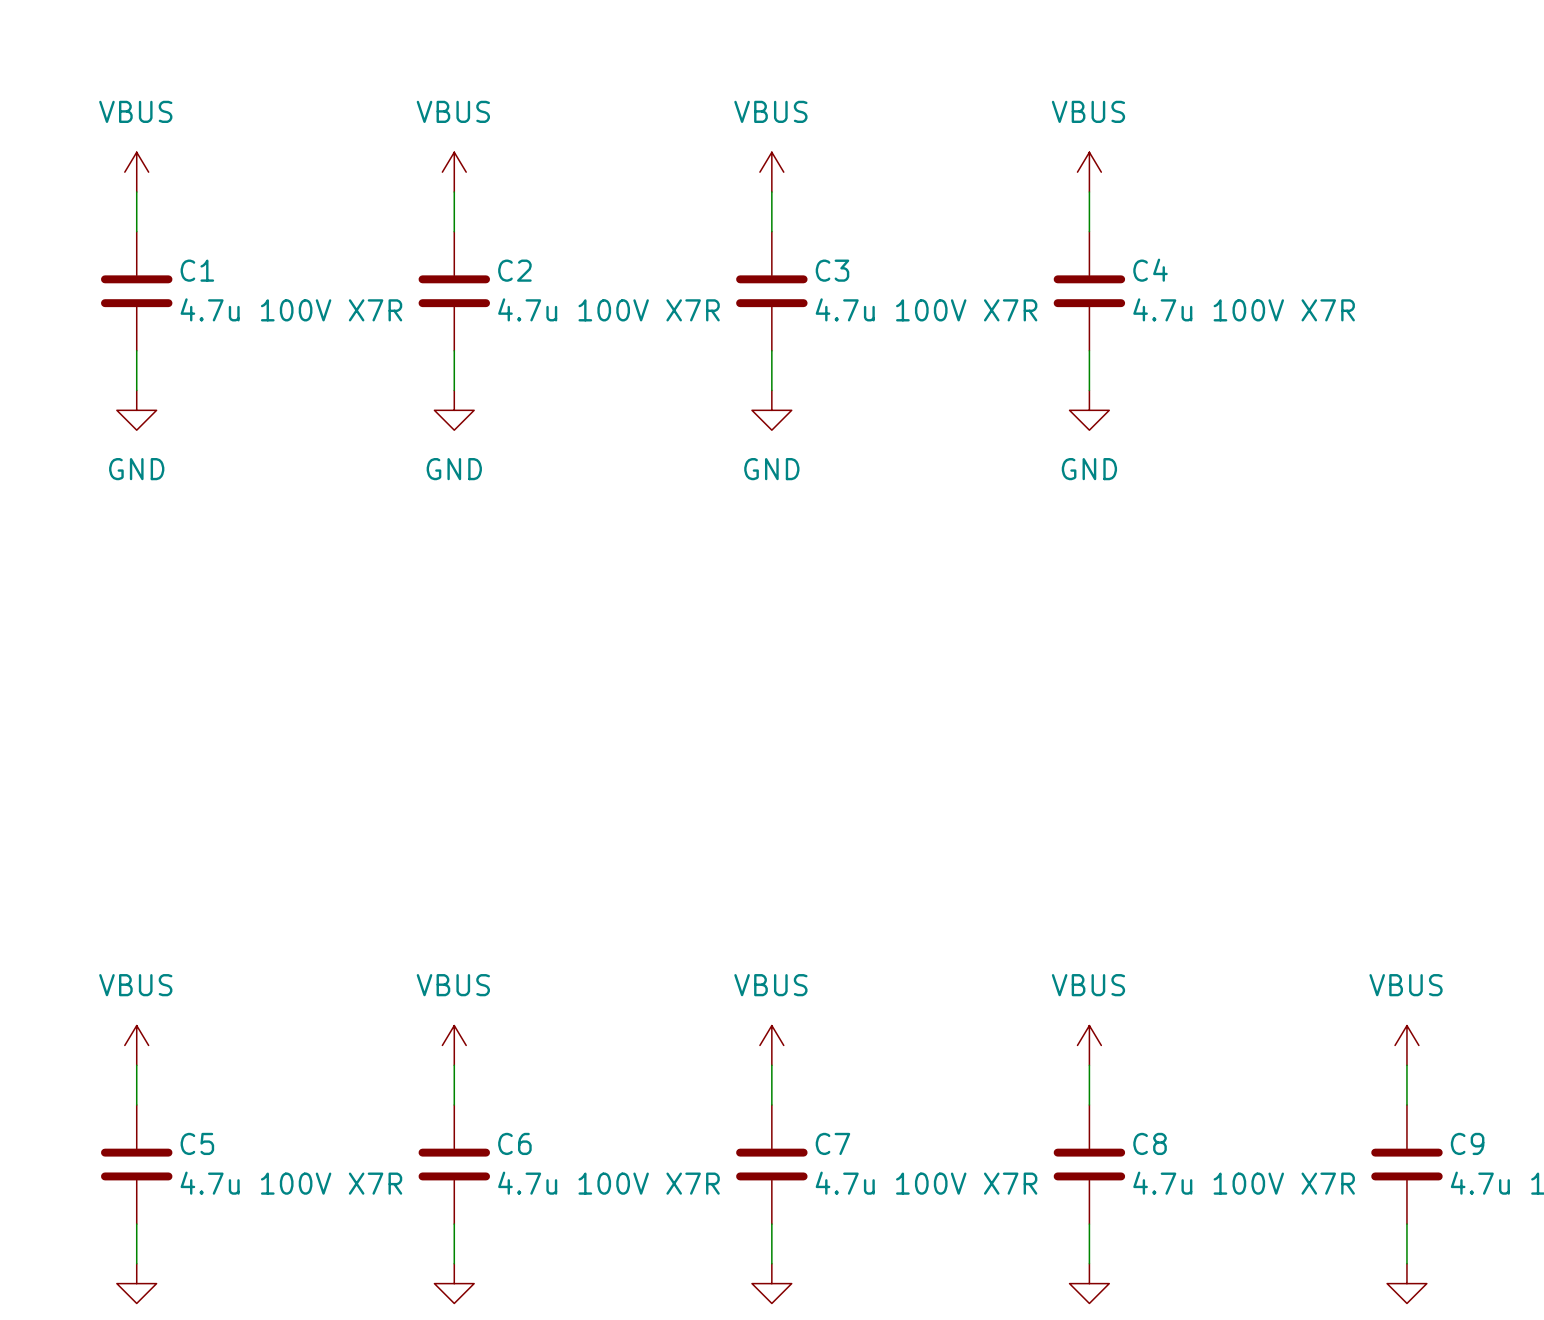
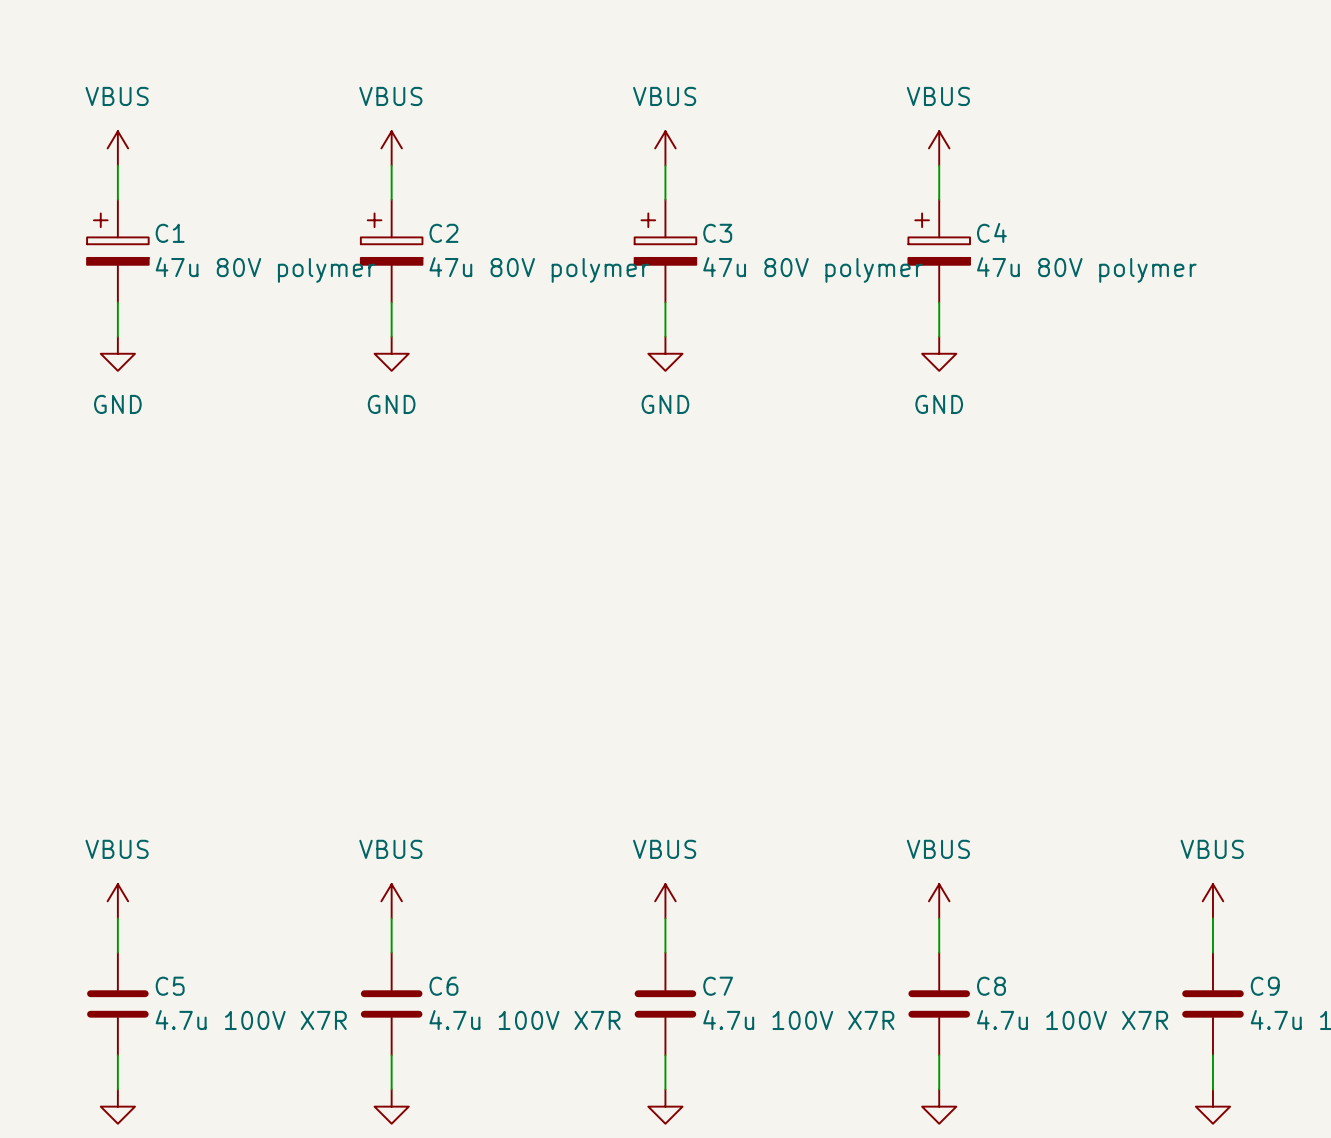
C1 symbol: [101, 231, 173, 351] -> [87, 199, 149, 303]
C2 symbol: [418, 231, 491, 351] -> [360, 199, 423, 303]
C3 symbol: [736, 231, 808, 351] -> [634, 199, 697, 303]
C4 symbol: [1053, 231, 1126, 351] -> [908, 199, 971, 303]
C1 value: 4.7u 100V X7R (291, 309) -> 47u 80V polymer (265, 270)
C2 value: 4.7u 100V X7R (608, 309) -> 47u 80V polymer (539, 270)
C3 value: 4.7u 100V X7R (926, 309) -> 47u 80V polymer (813, 270)
C4 value: 4.7u 100V X7R (1244, 309) -> 47u 80V polymer (1086, 270)

